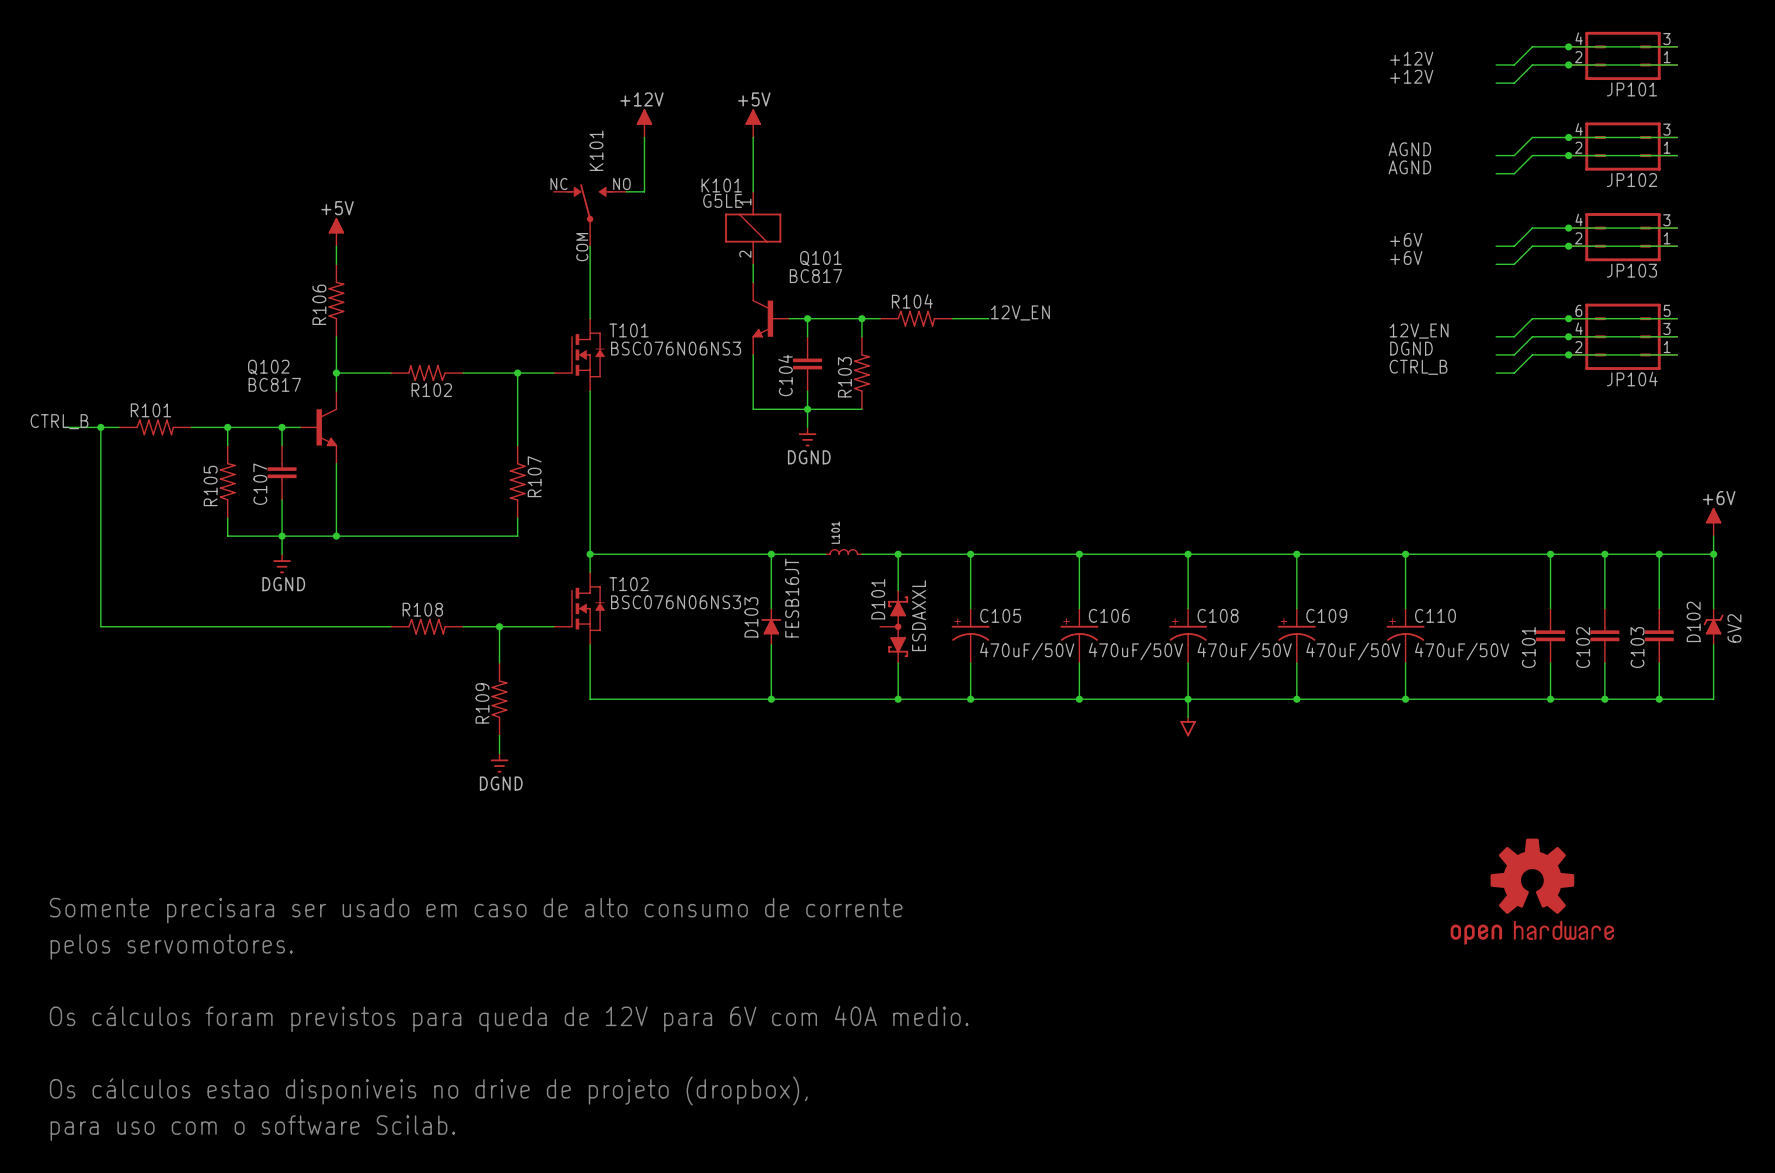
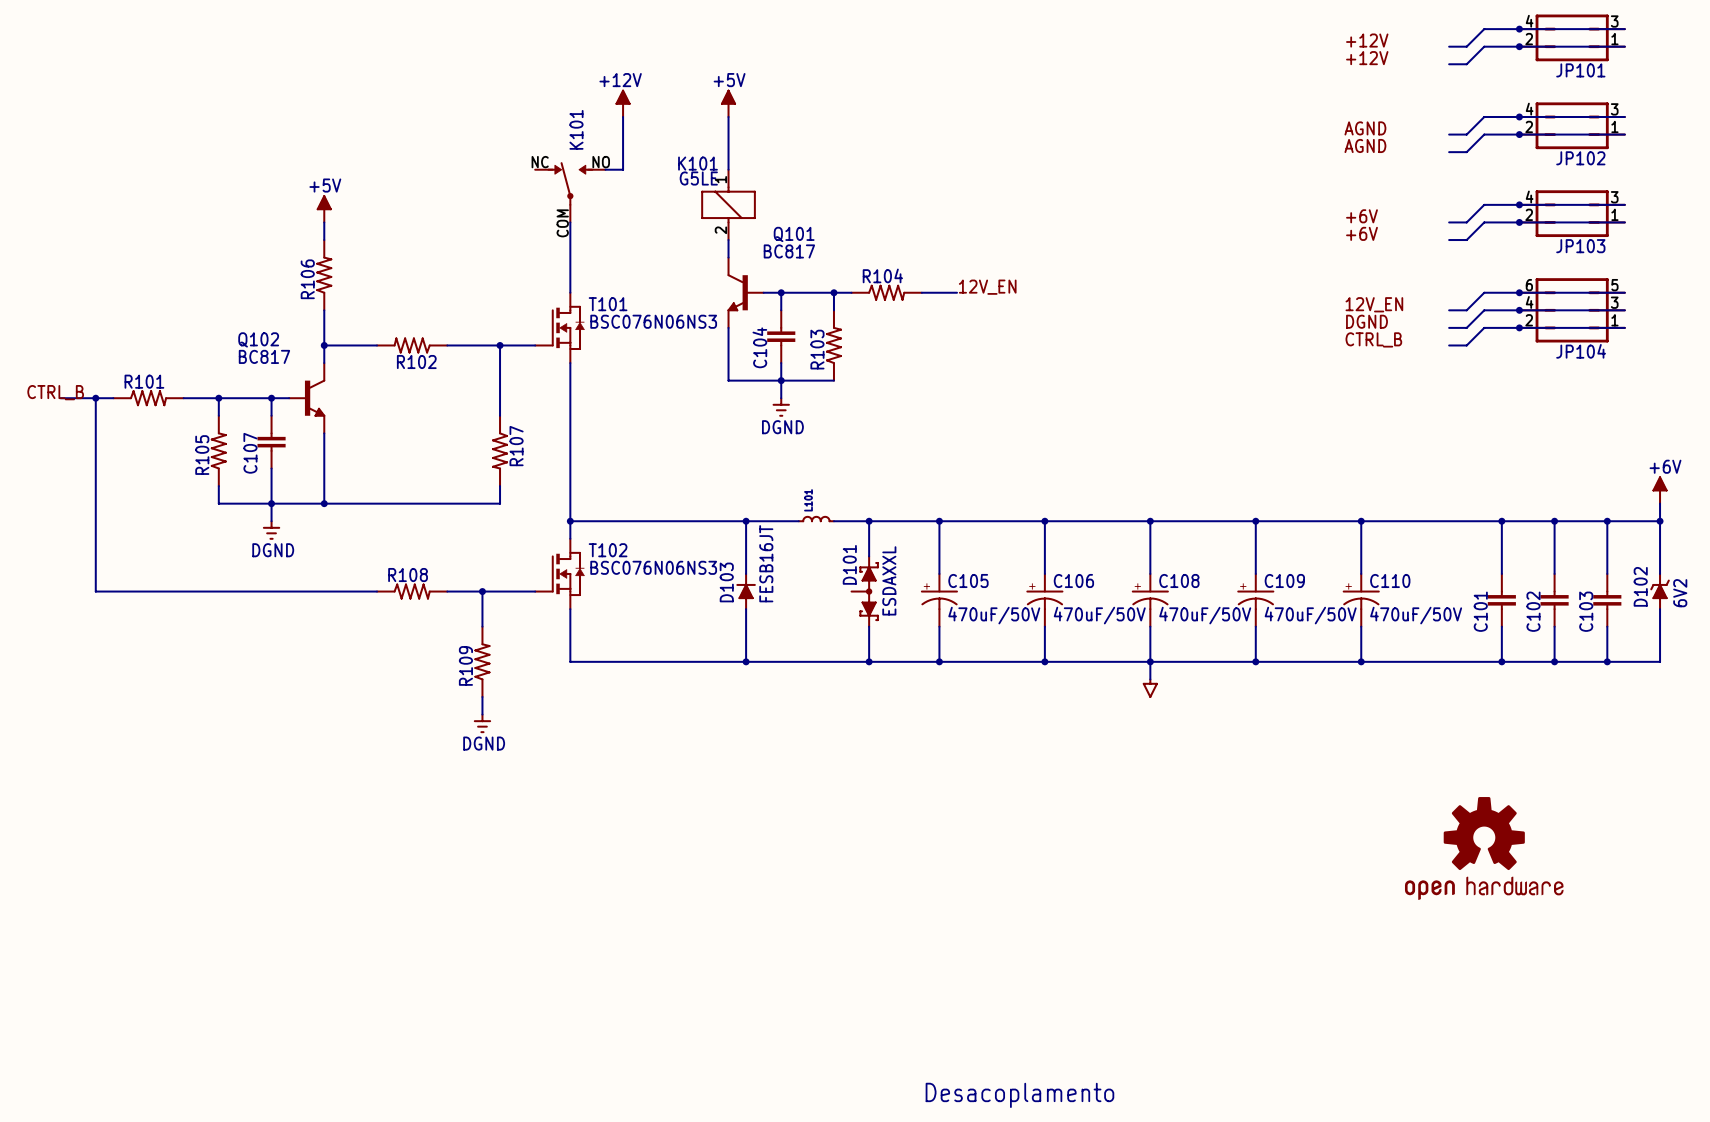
text: Somente precisara ser usado em caso de alto consumo de corrente (476, 910) -> none
text: pelos servomotores. (171, 946) -> none
text: Os cálculos foram previstos para queda de 12V para 6V com 40A medio. (509, 1018) -> none
text: Os cálculos estao disponiveis no drive de projeto (dropbox), (428, 1090) -> none
text: para uso com o software Scilab. (252, 1128) -> none
text: none -> Desacoplamento (1019, 1095)

